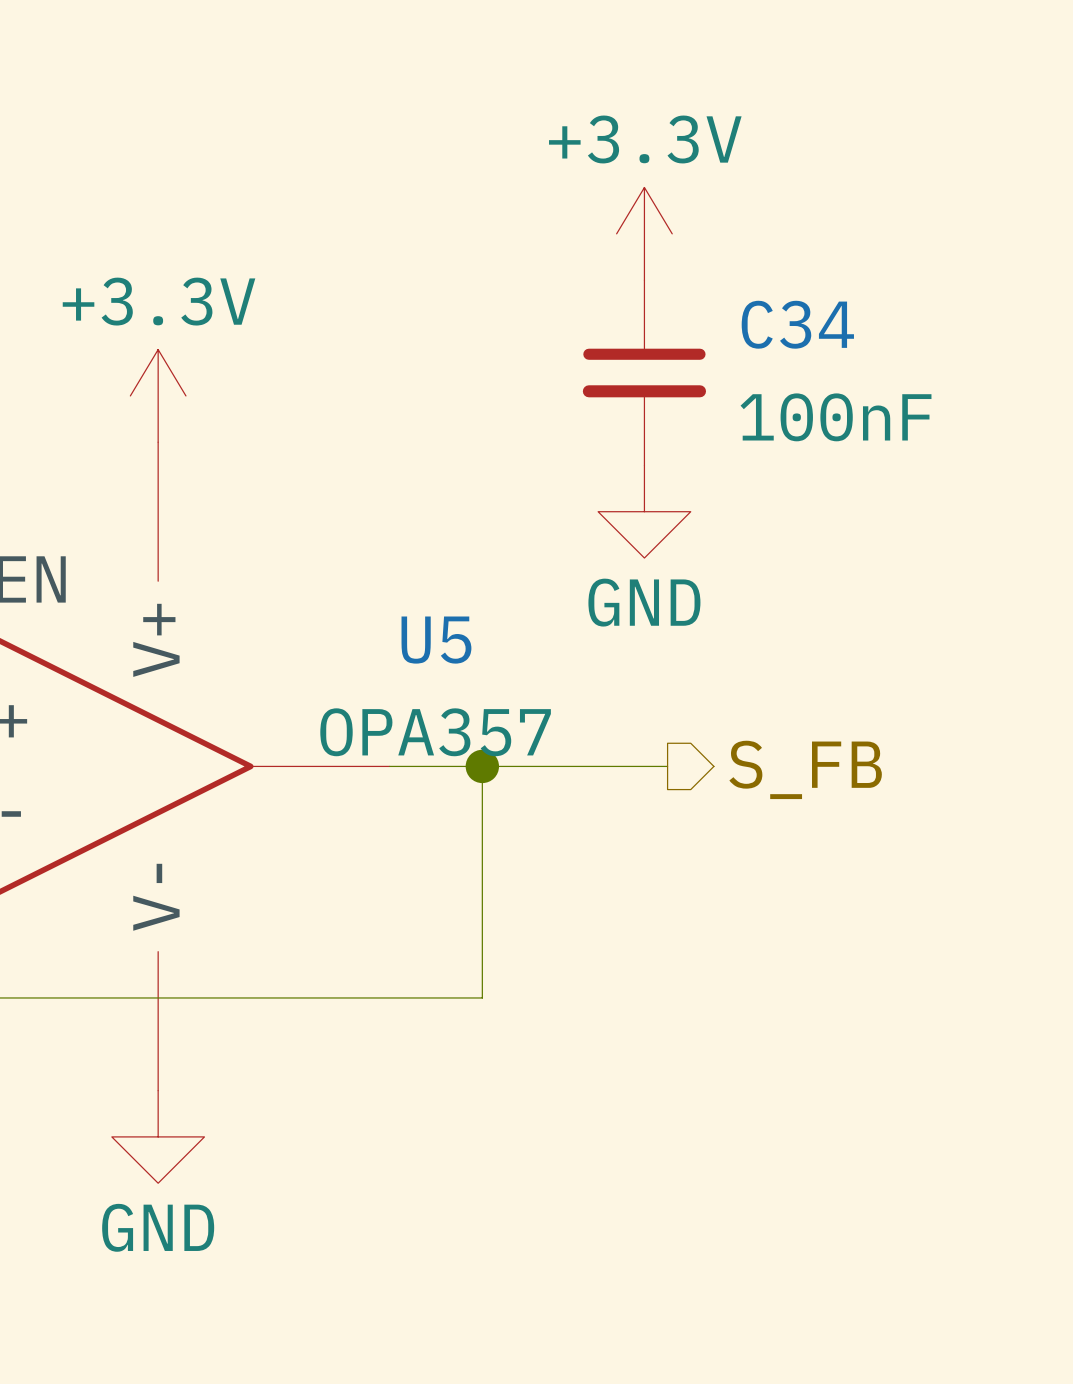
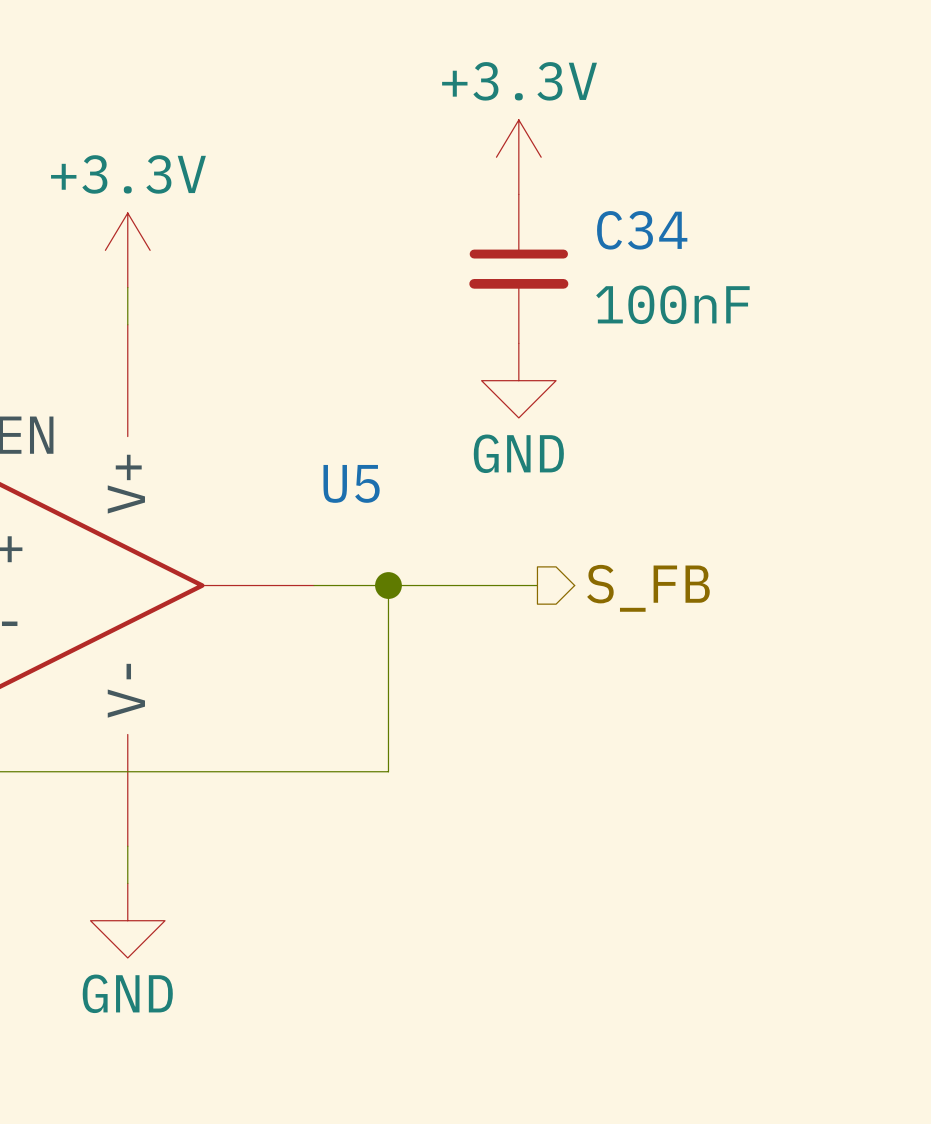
power symbol position: +3.3V (158, 395) -> +3.3V (127, 250)
U5 value: OPA357 (435, 732) -> none
power symbol position: GND (158, 1136) -> GND (127, 920)

